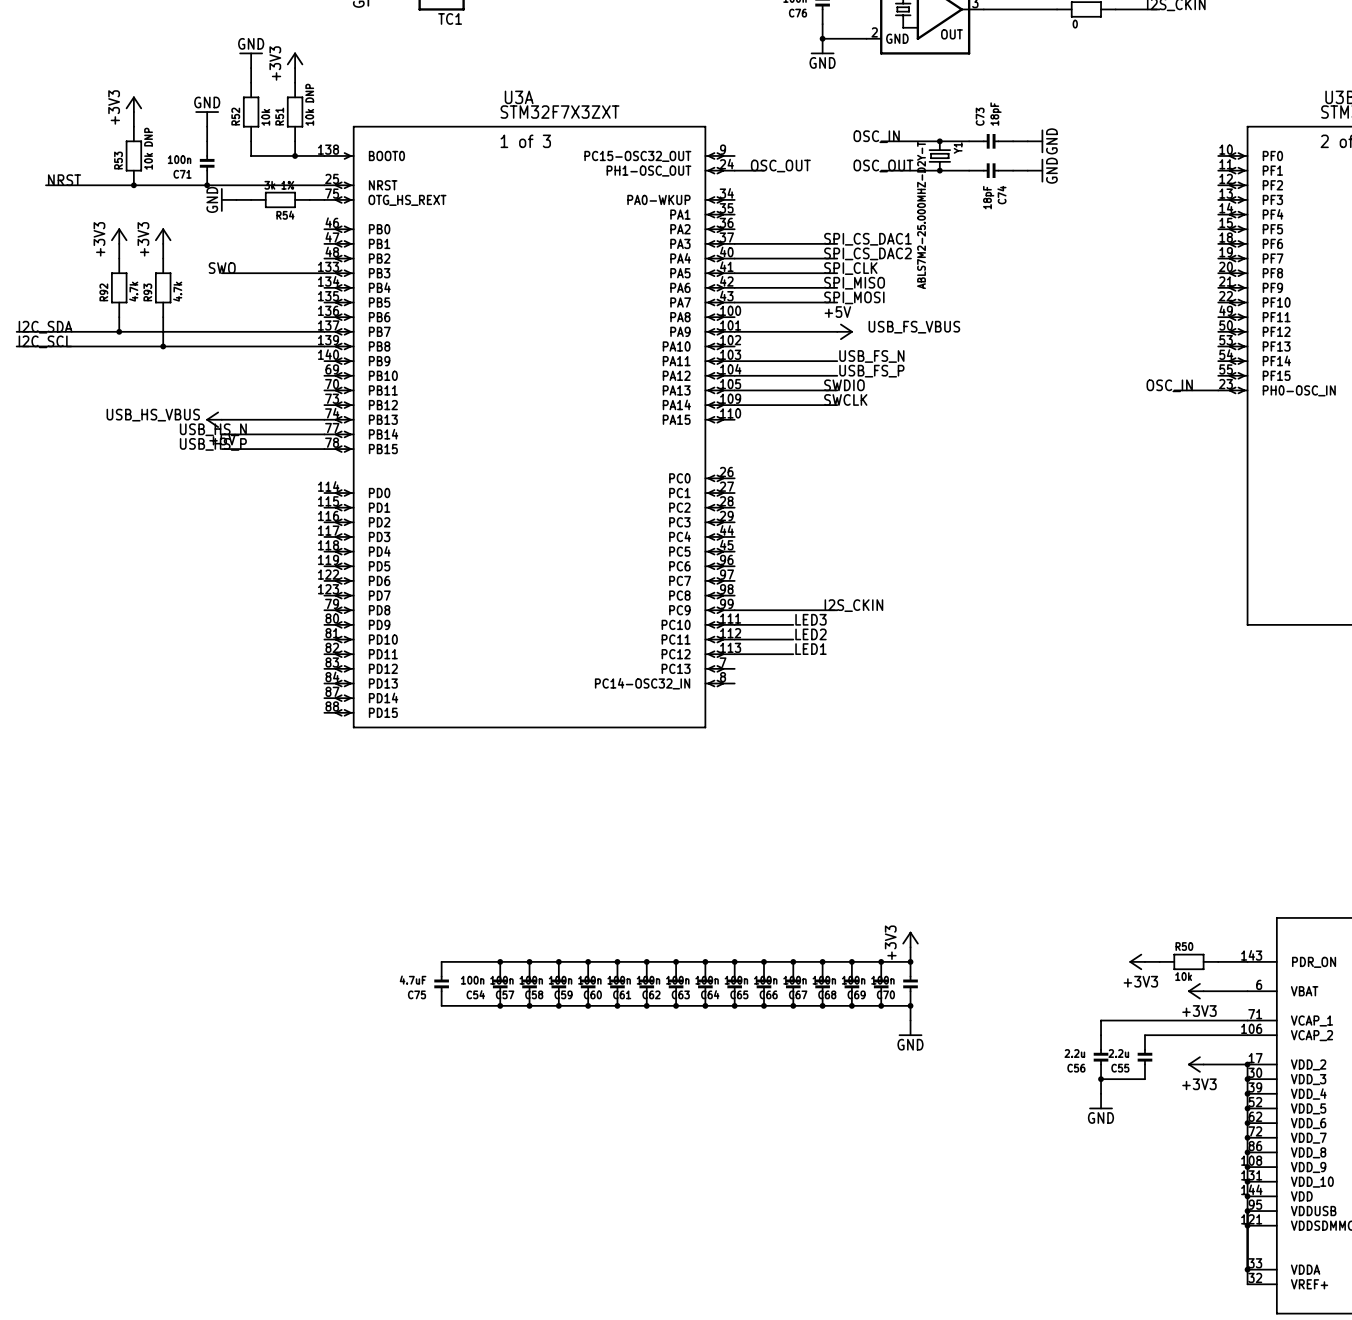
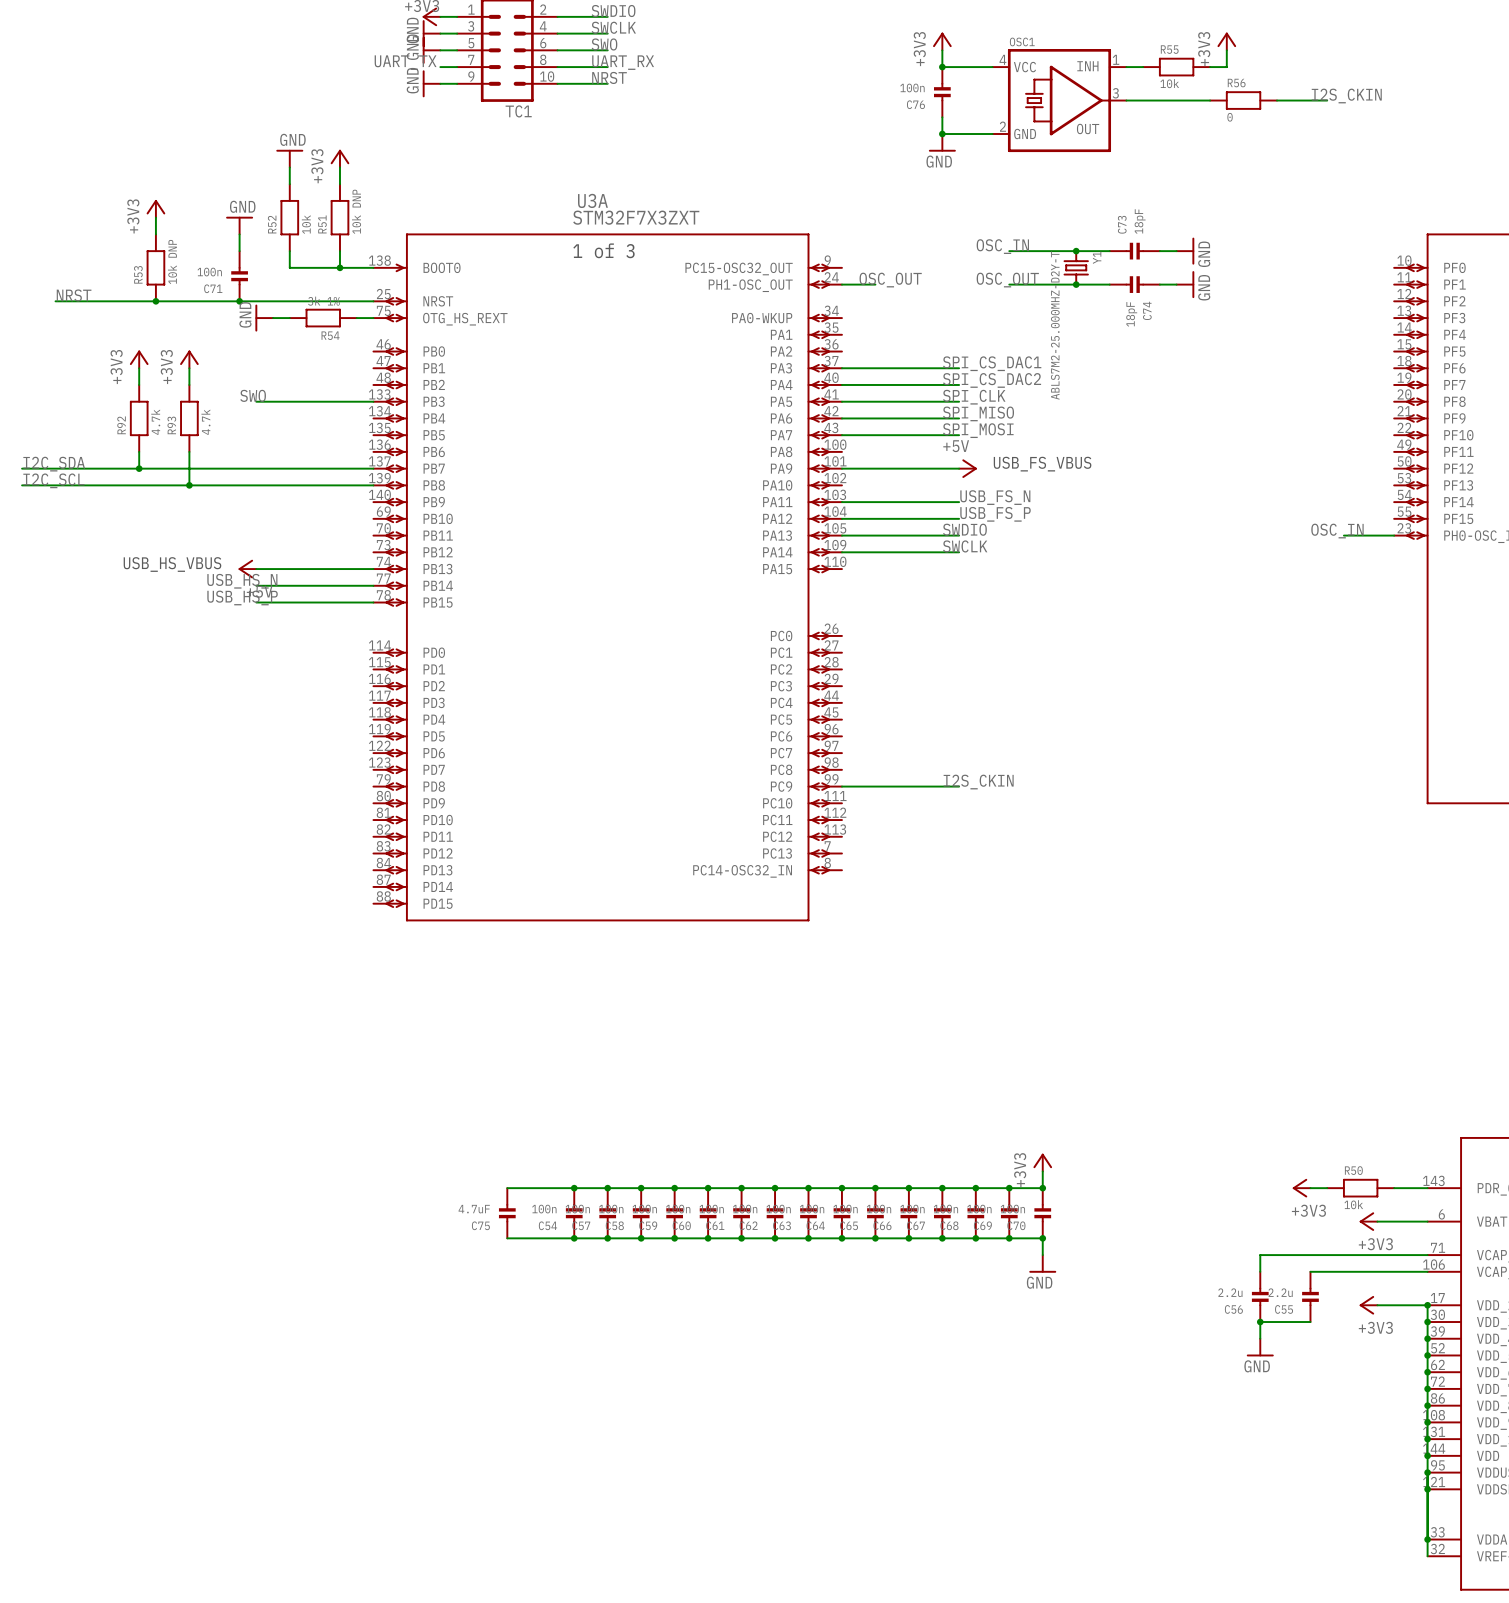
label: LED3 (810, 619) -> none
wire: (734, 624) (793, 624) -> none
label: LED2 (810, 634) -> none
wire: (734, 639) (793, 639) -> none
label: LED1 (810, 649) -> none
wire: (734, 654) (793, 654) -> none

